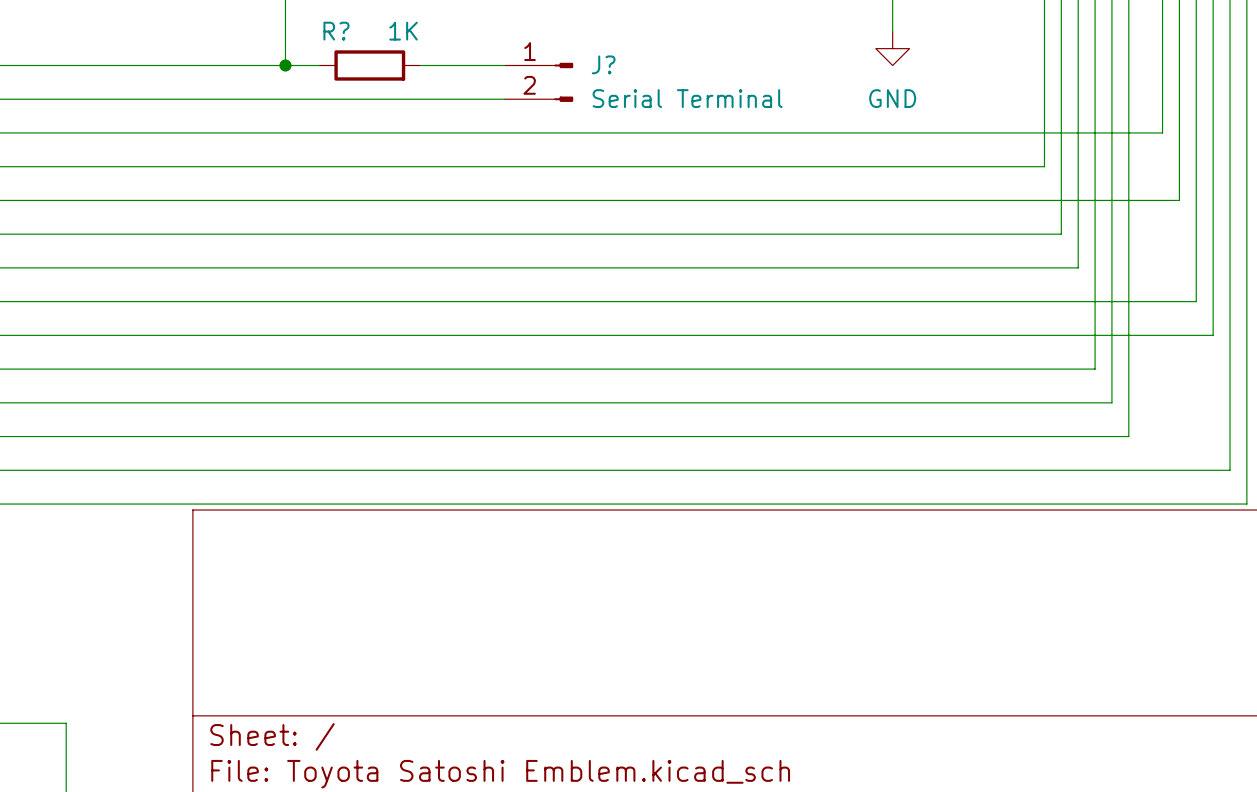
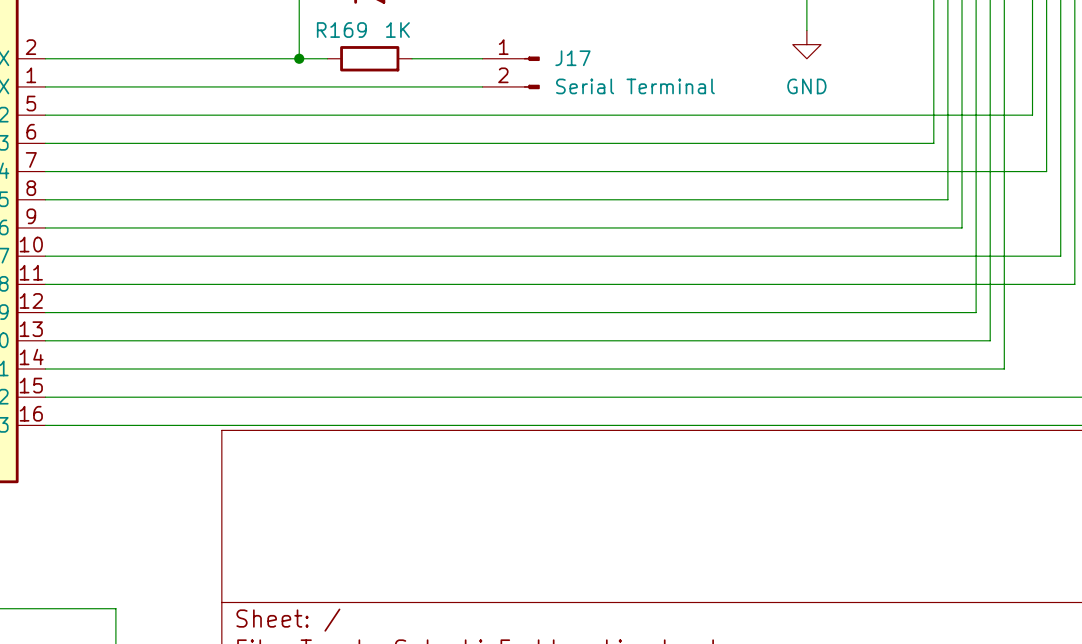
R? name: R? (336, 31) -> R169 (341, 30)
J? name: J? (603, 64) -> J17 (572, 58)

